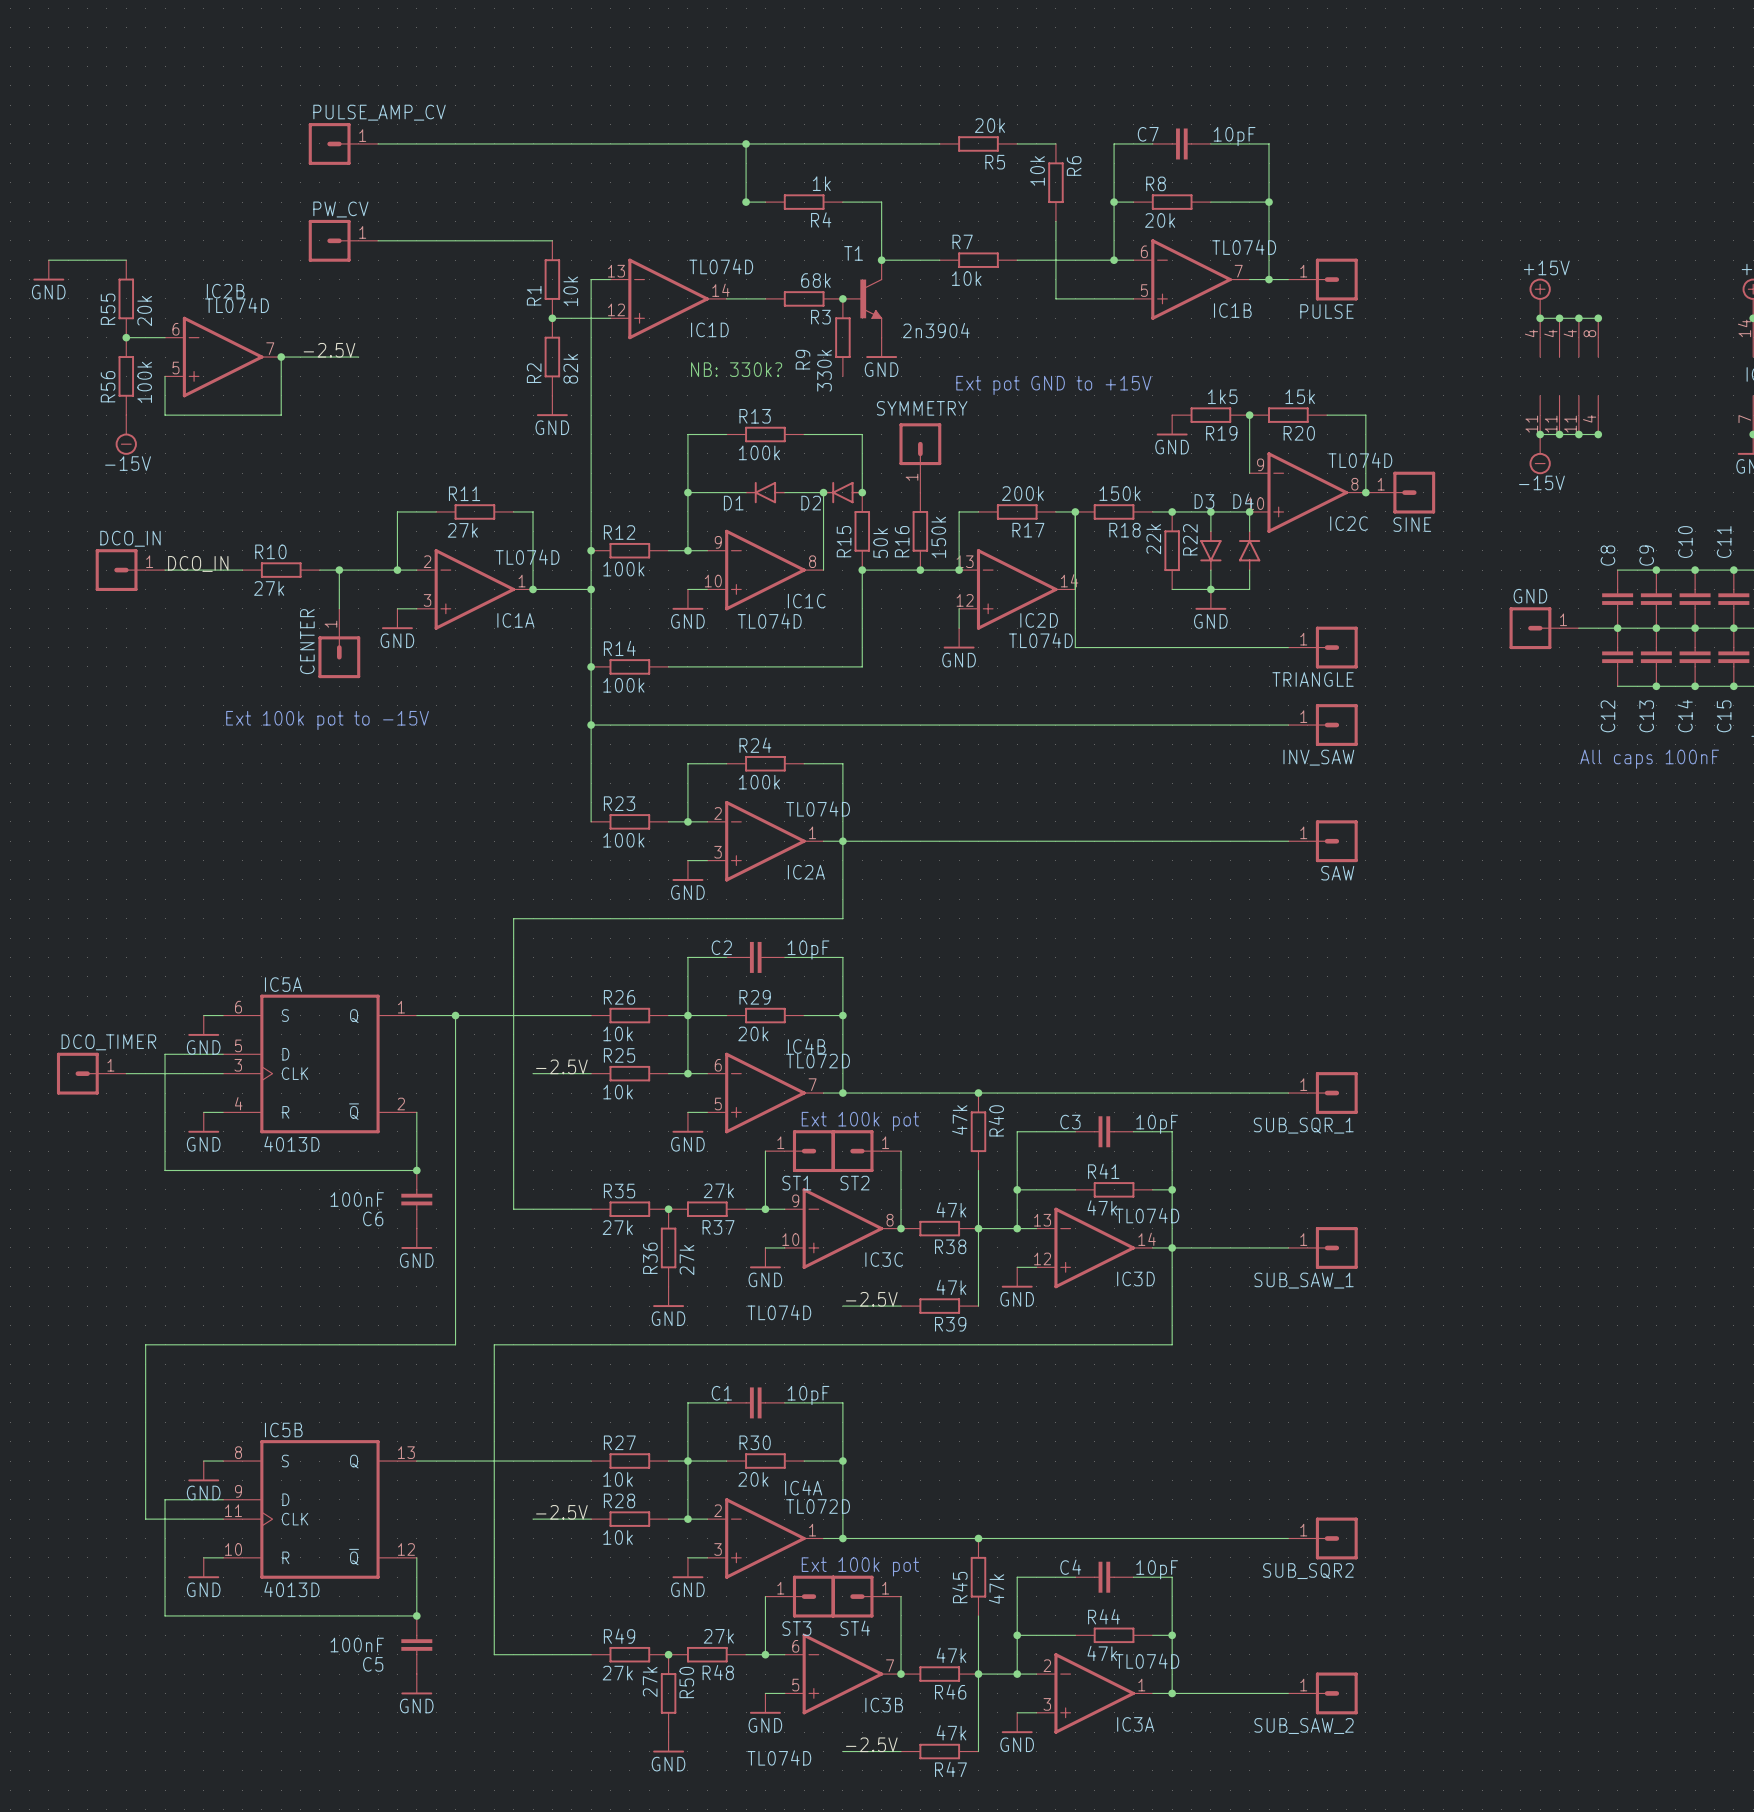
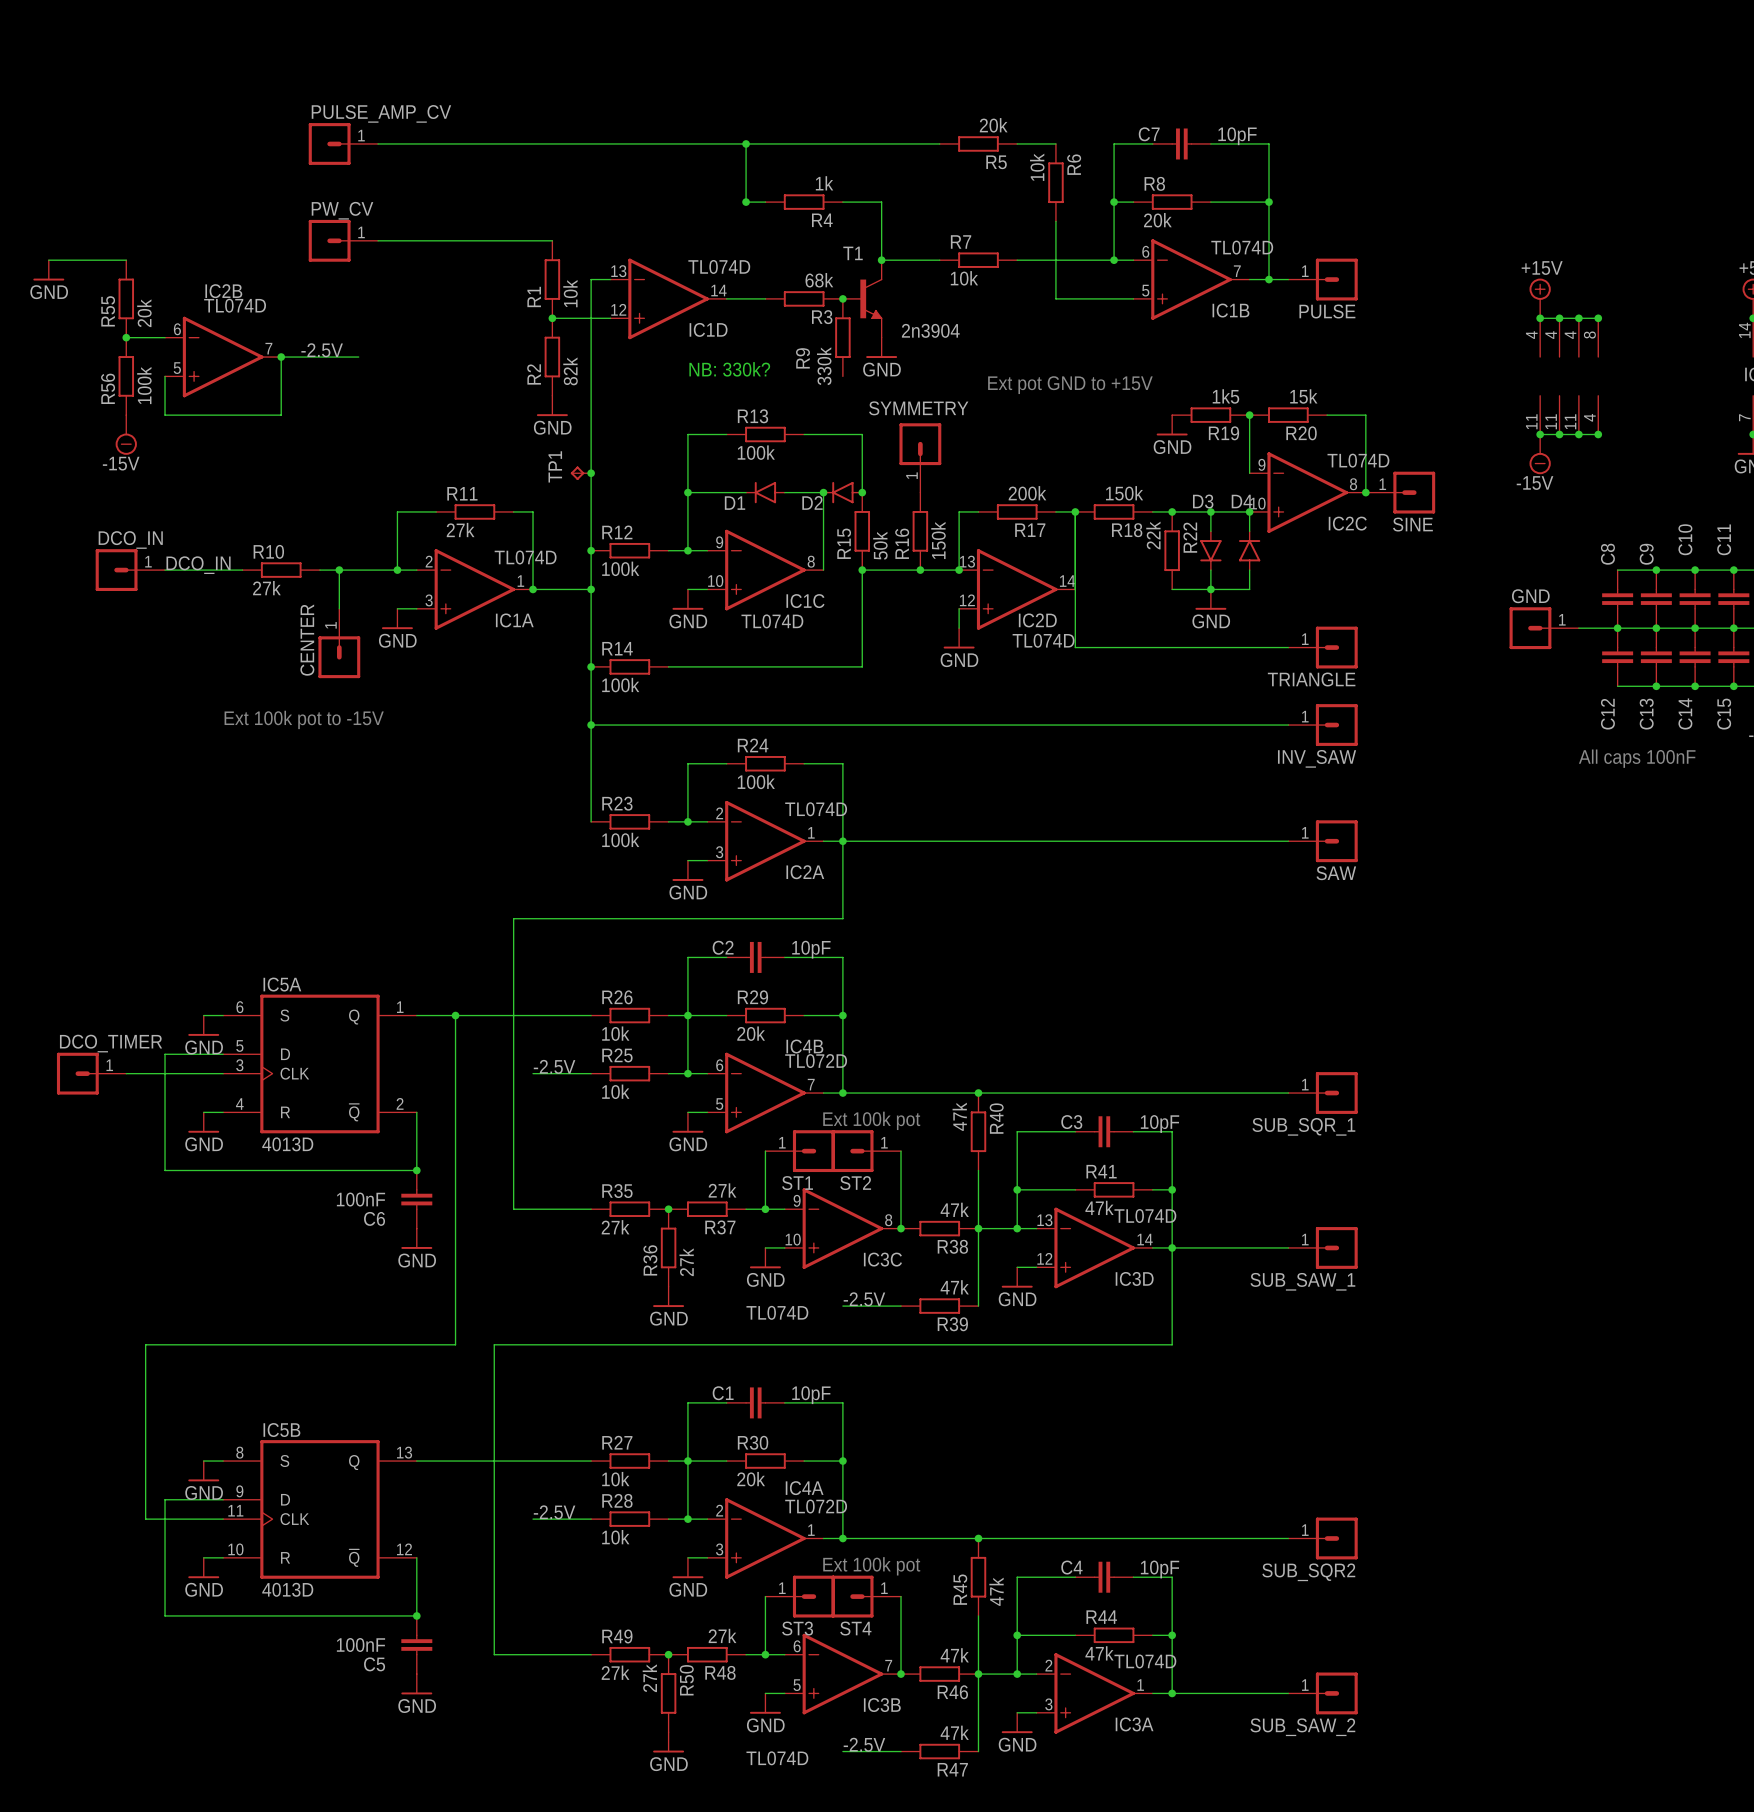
TP1: none -> (580, 473)
junction: none -> (591, 473)

